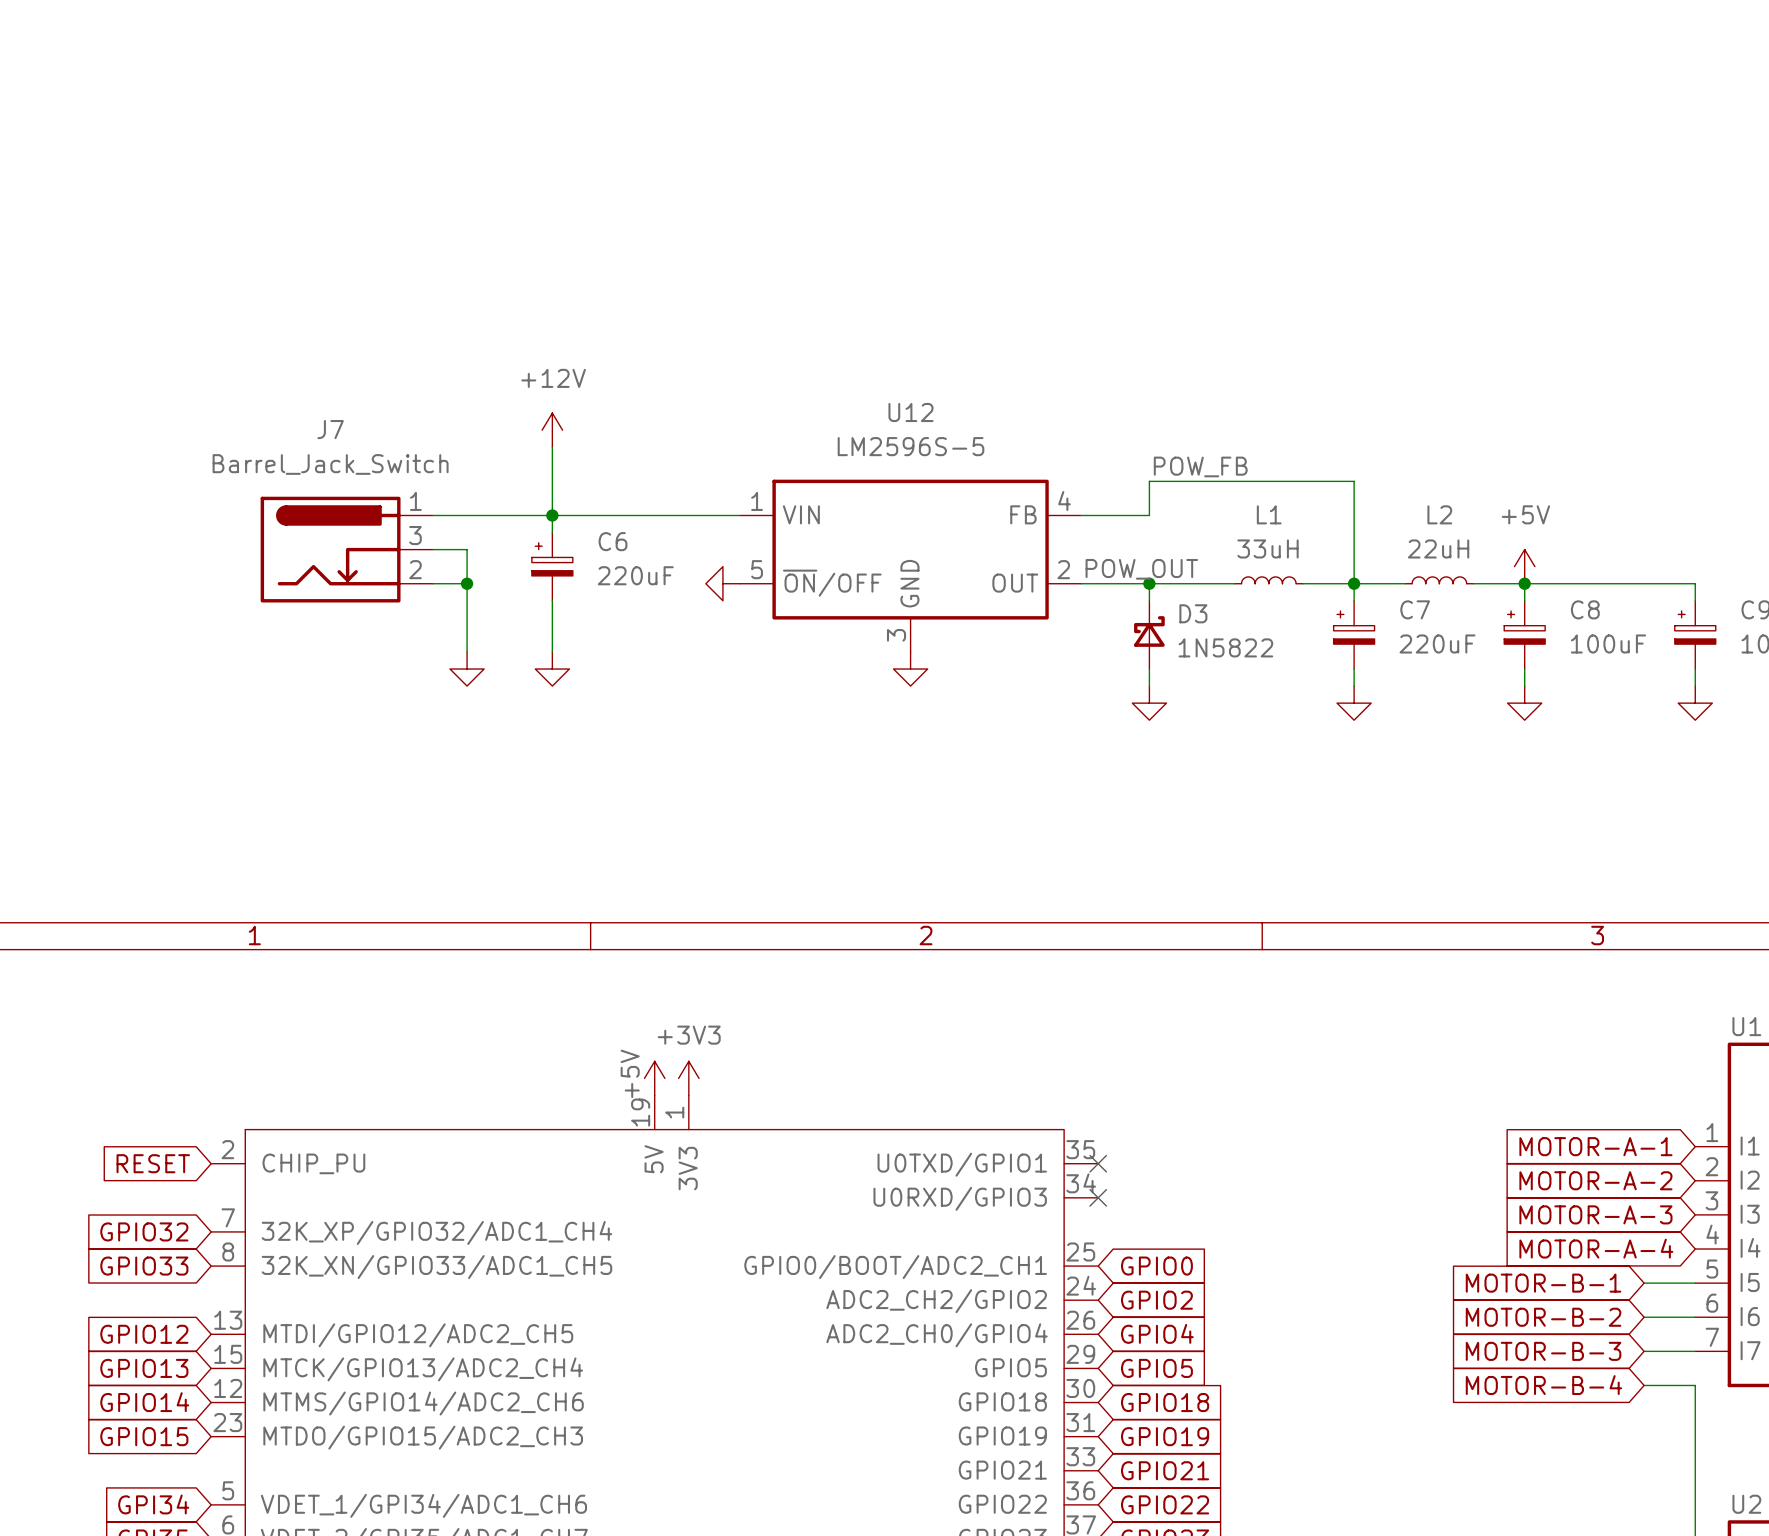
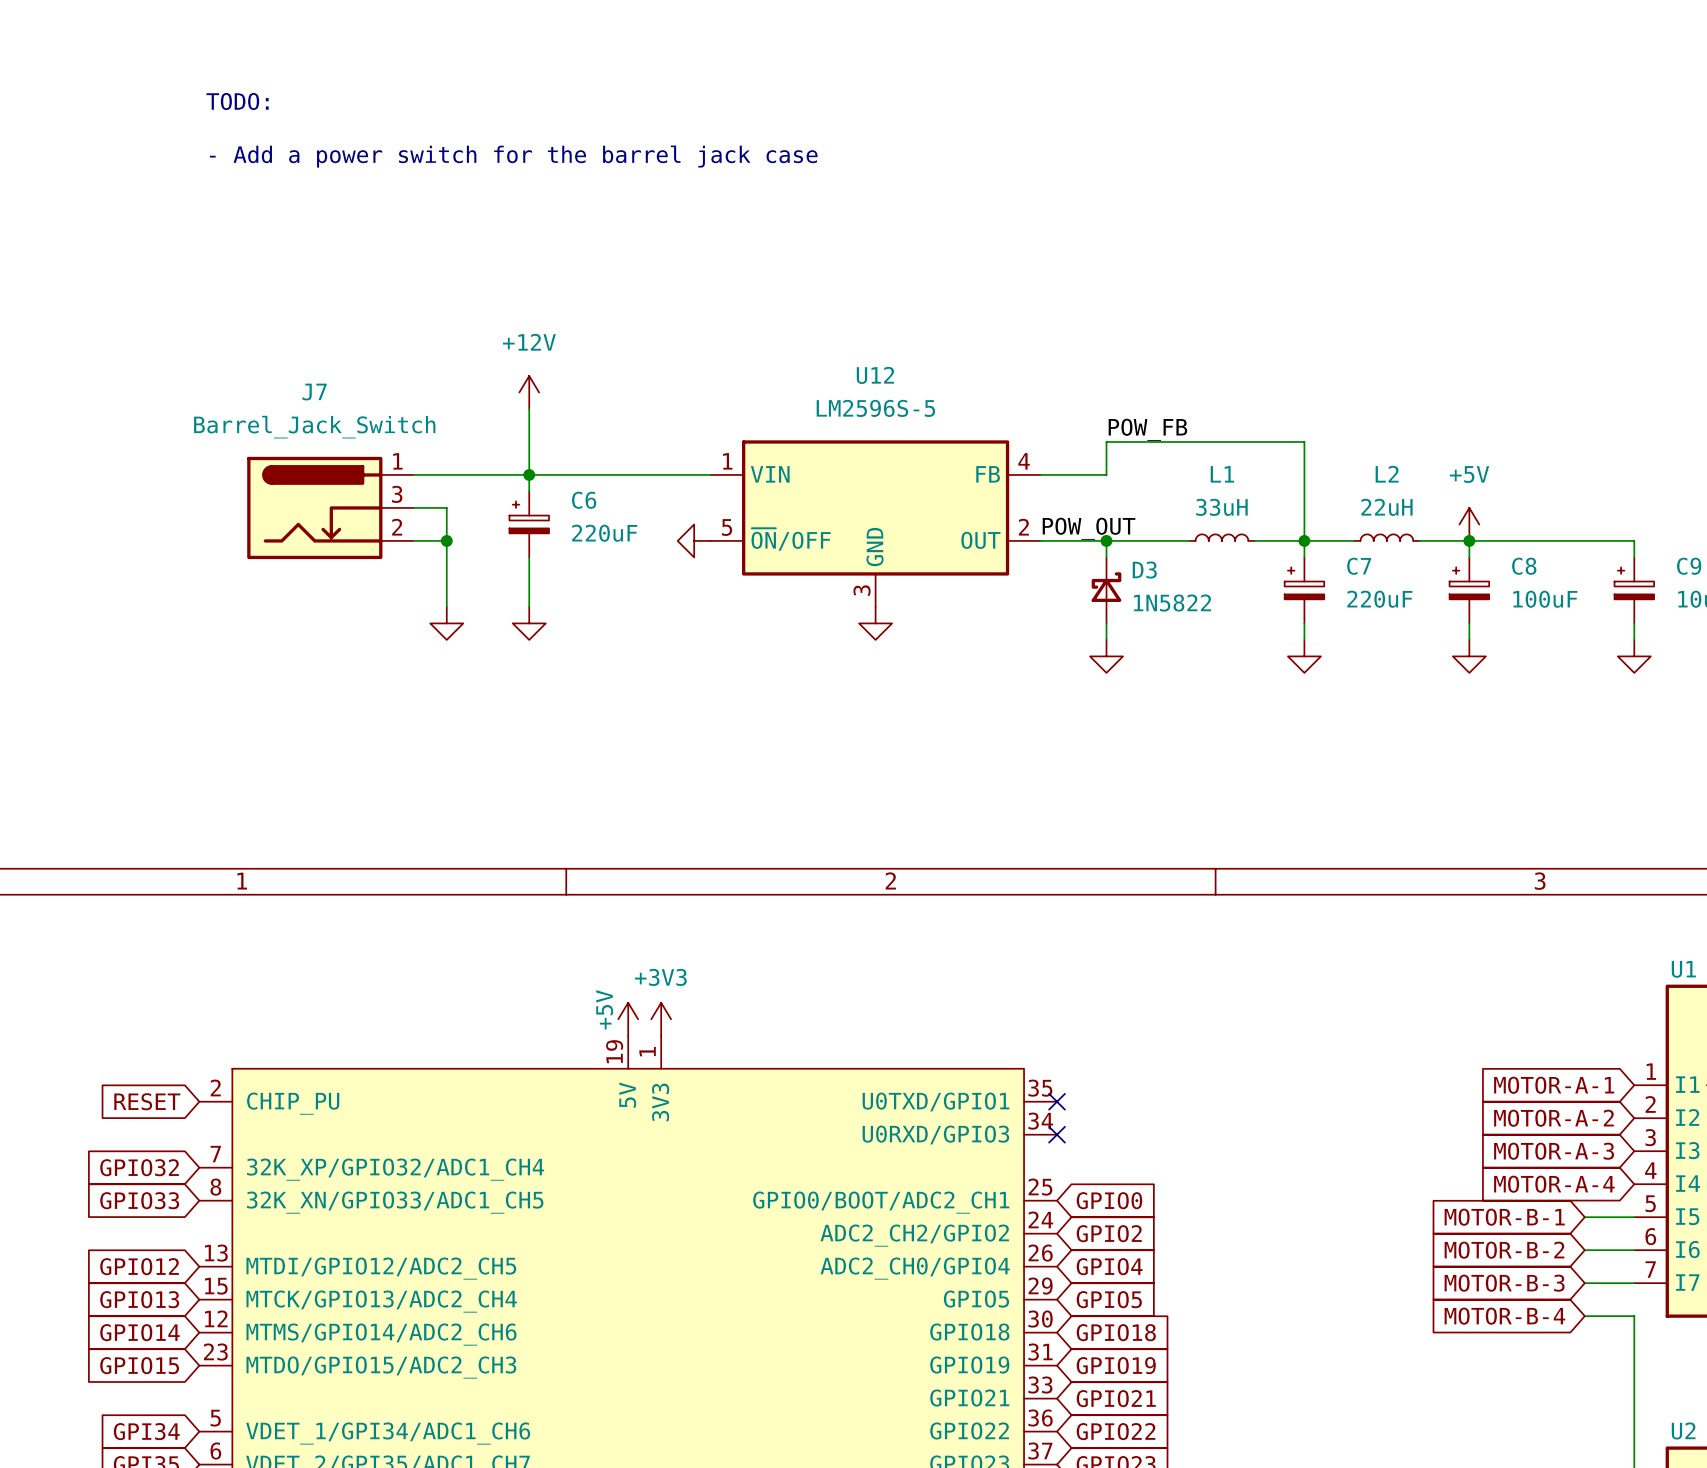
text: none -> TODO: (237, 101)
text: none -> - Add a power switch for the barrel jack case (513, 156)

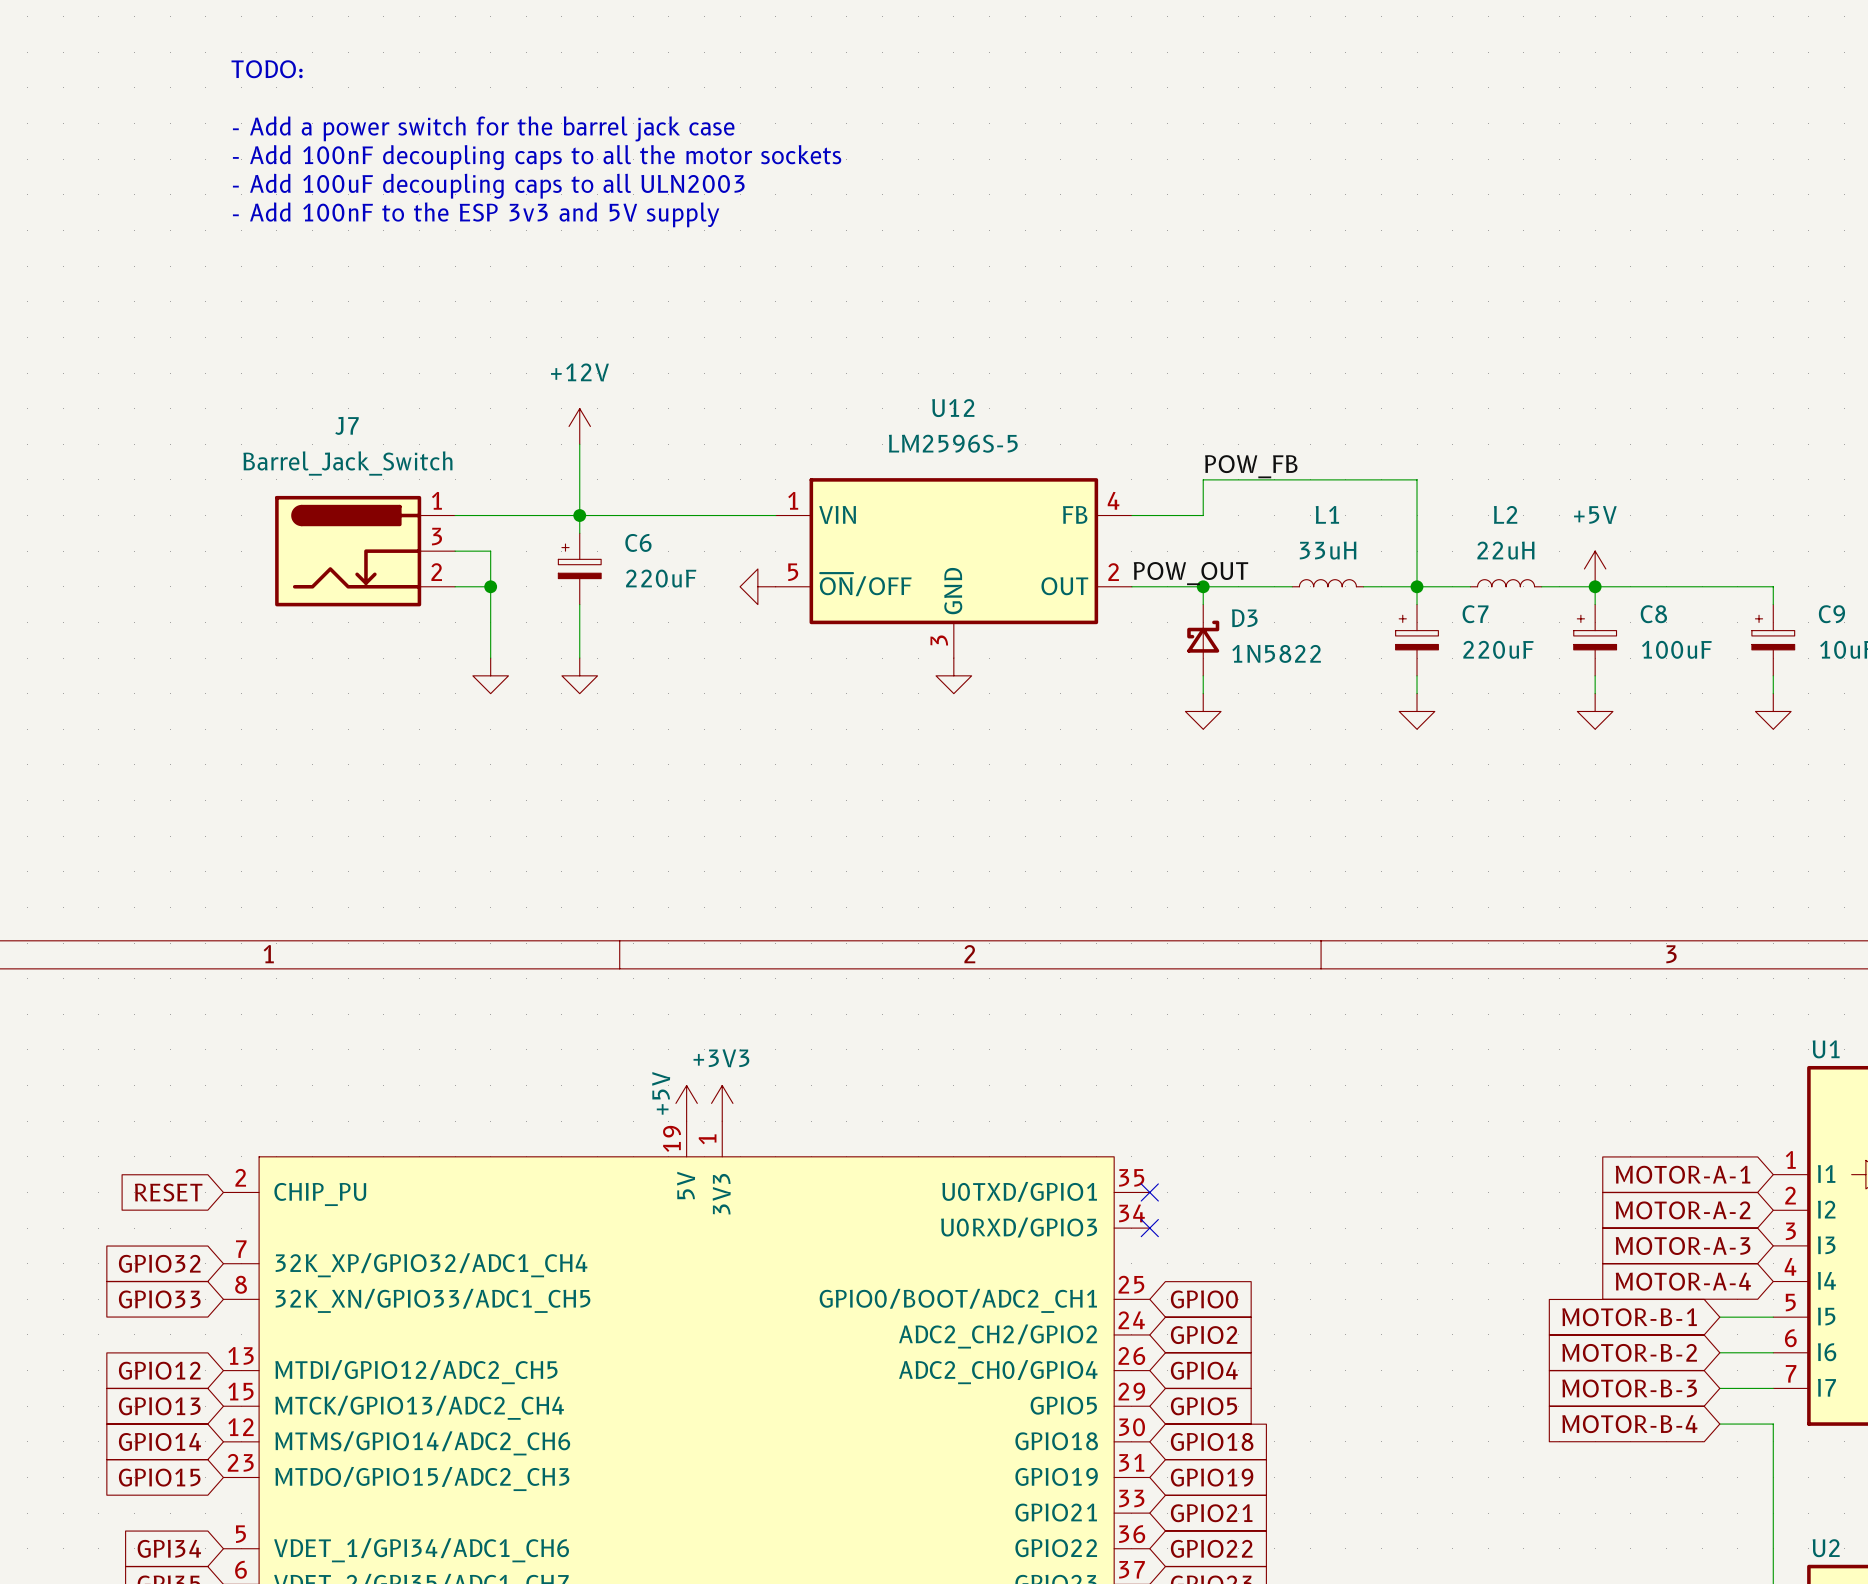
text position: TODO: (237, 101) -> TODO: (267, 69)
text: none -> - Add 100nF decoupling caps to all the motor sockets (537, 157)
text position: - Add a power switch for the barrel jack case (513, 156) -> - Add a power switch for the barrel jack case (483, 128)
text: none -> - Add 100uF decoupling caps to all ULN2003 (488, 186)
text: none -> - Add 100nF to the ESP 3v3 and 5V supply (476, 214)

